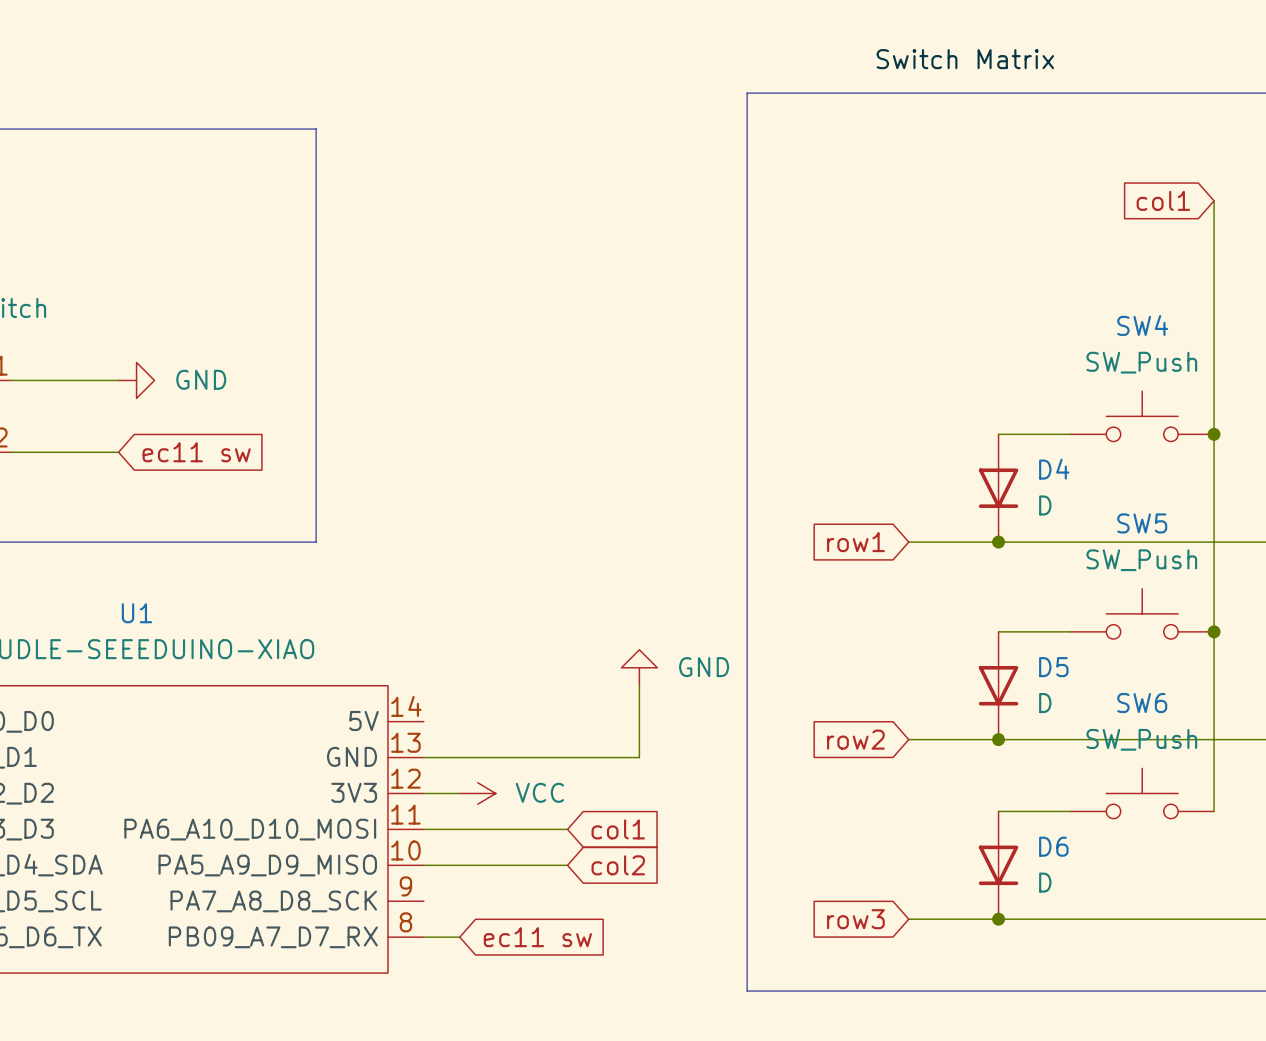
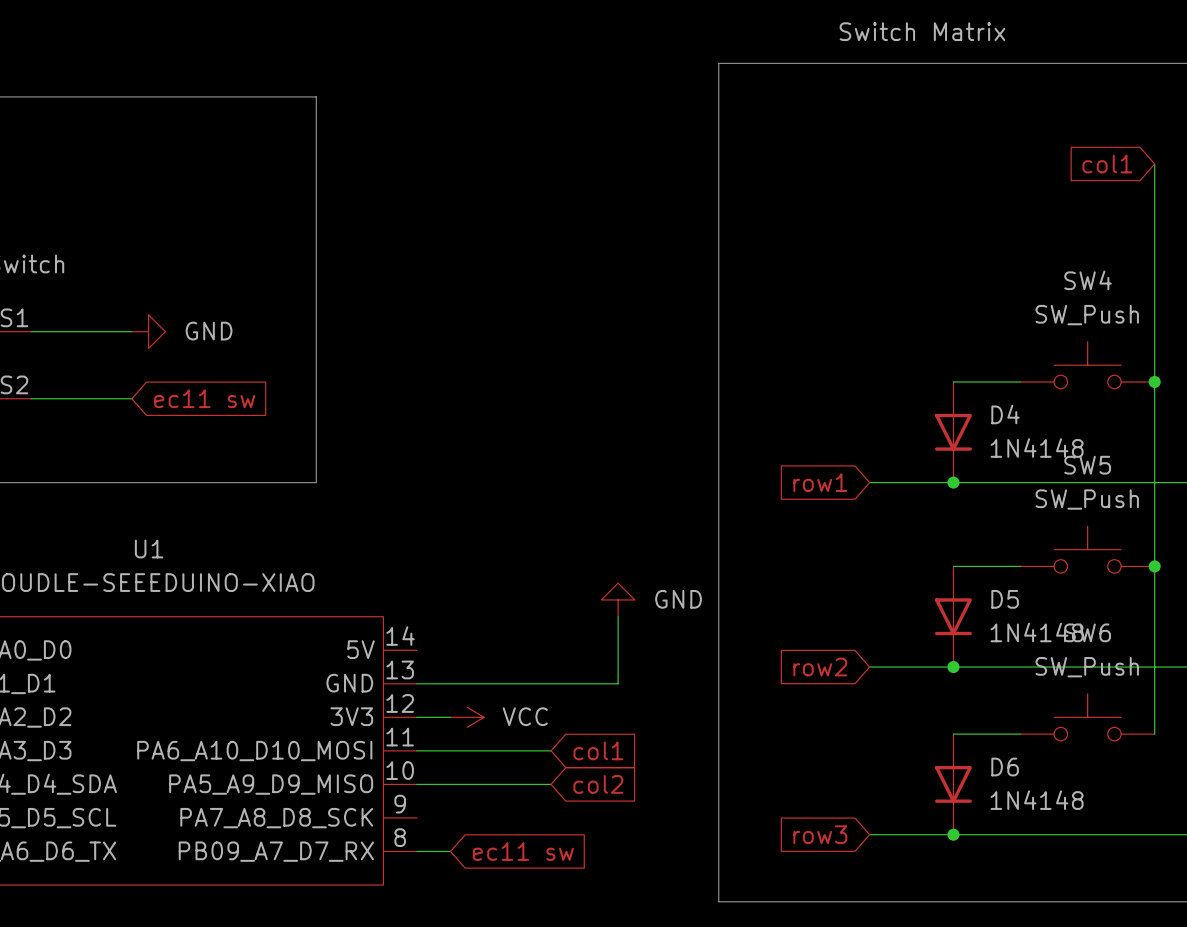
D4 value: D (1045, 505) -> 1N4148 (1037, 448)
D5 value: D (1045, 703) -> 1N4148 (1037, 632)
D6 value: D (1045, 882) -> 1N4148 (1037, 800)

